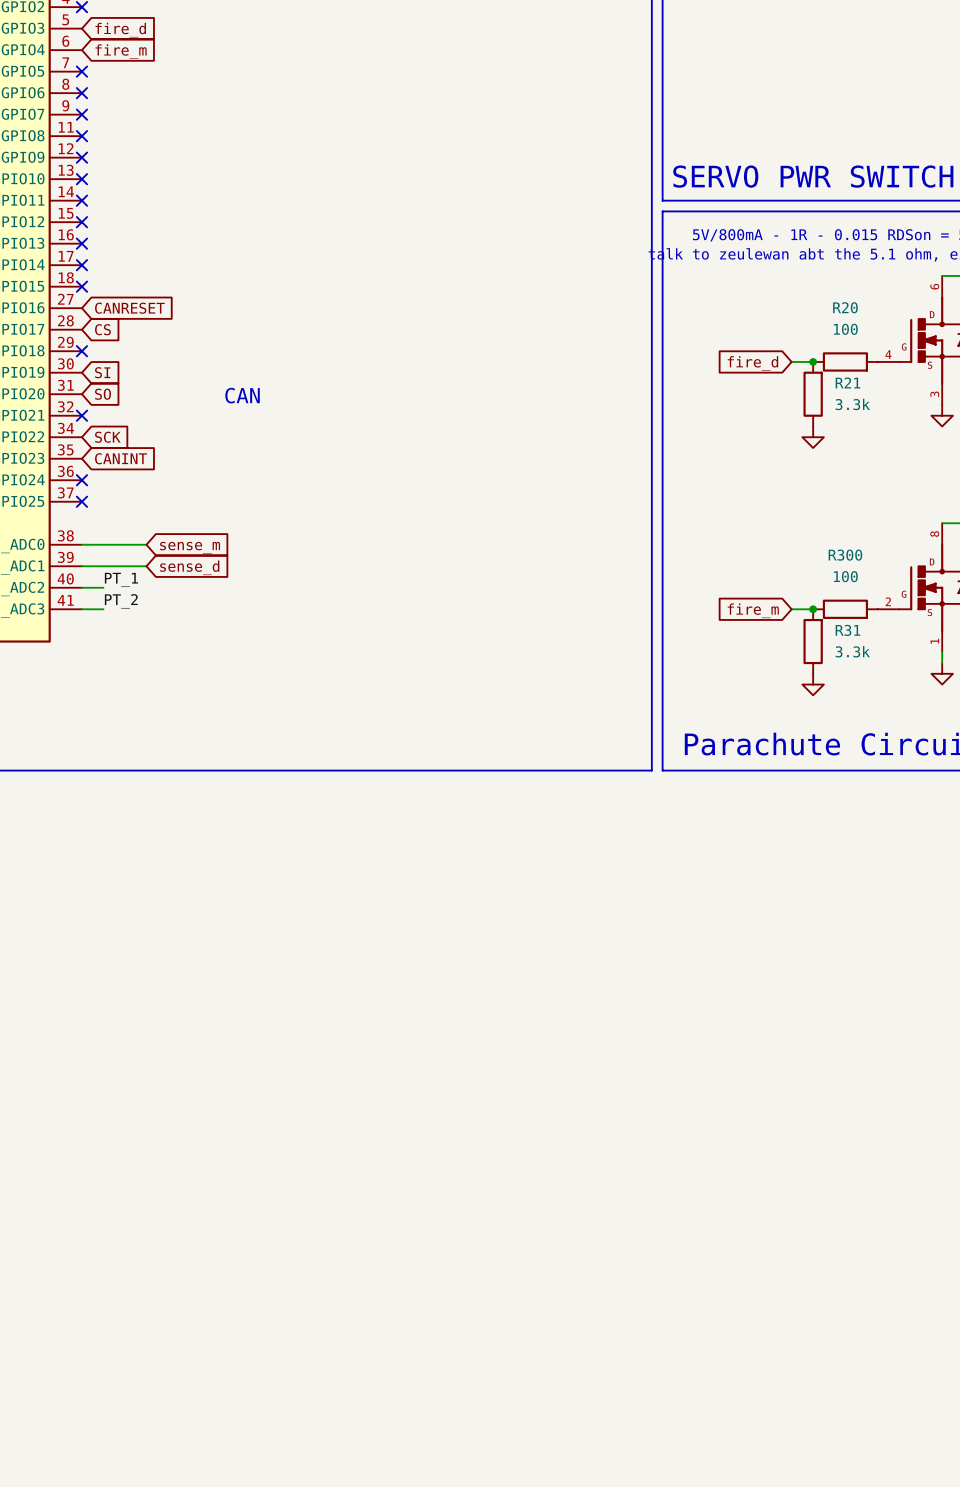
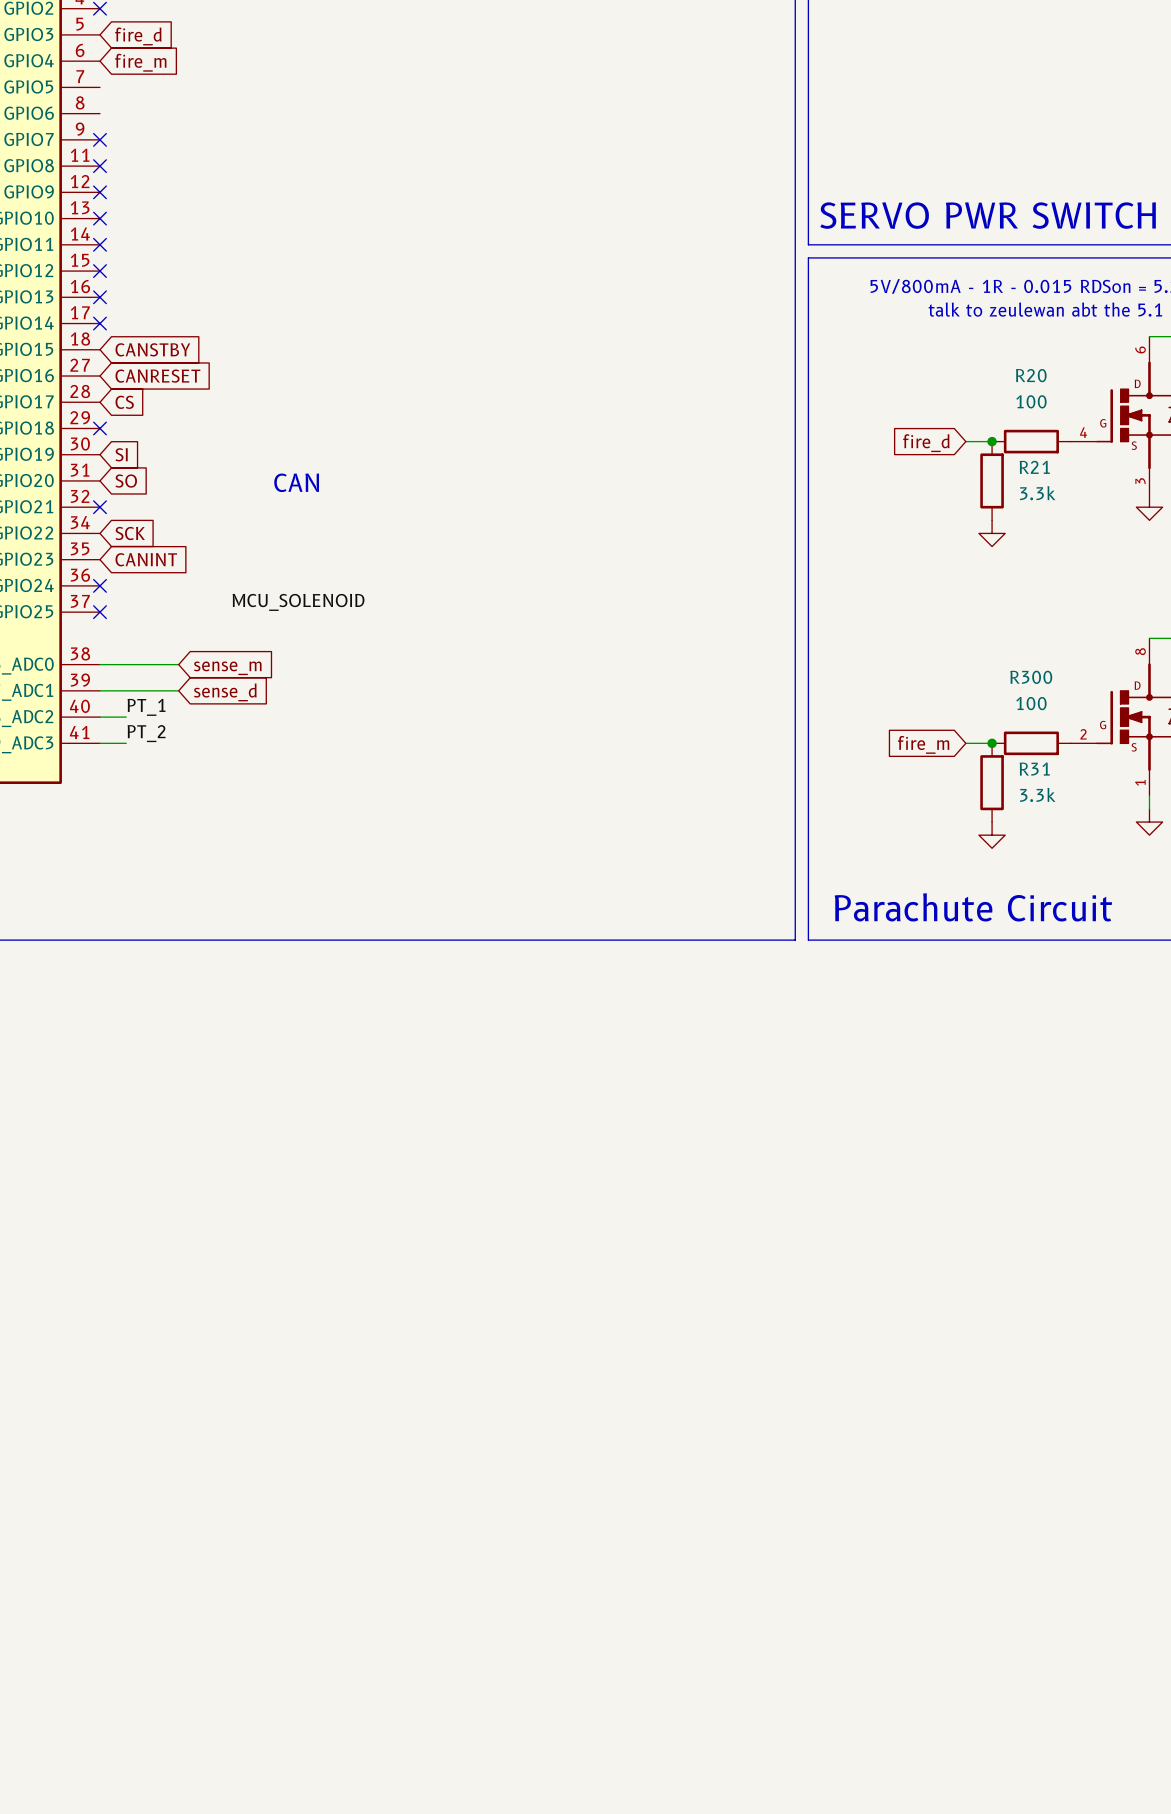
no-connect mark: (81, 71) -> none
no-connect mark: (81, 93) -> none
no-connect mark: (81, 286) -> none
global label: none -> CANSTBY (152, 349)
label: none -> MCU_SOLENOID (298, 602)

